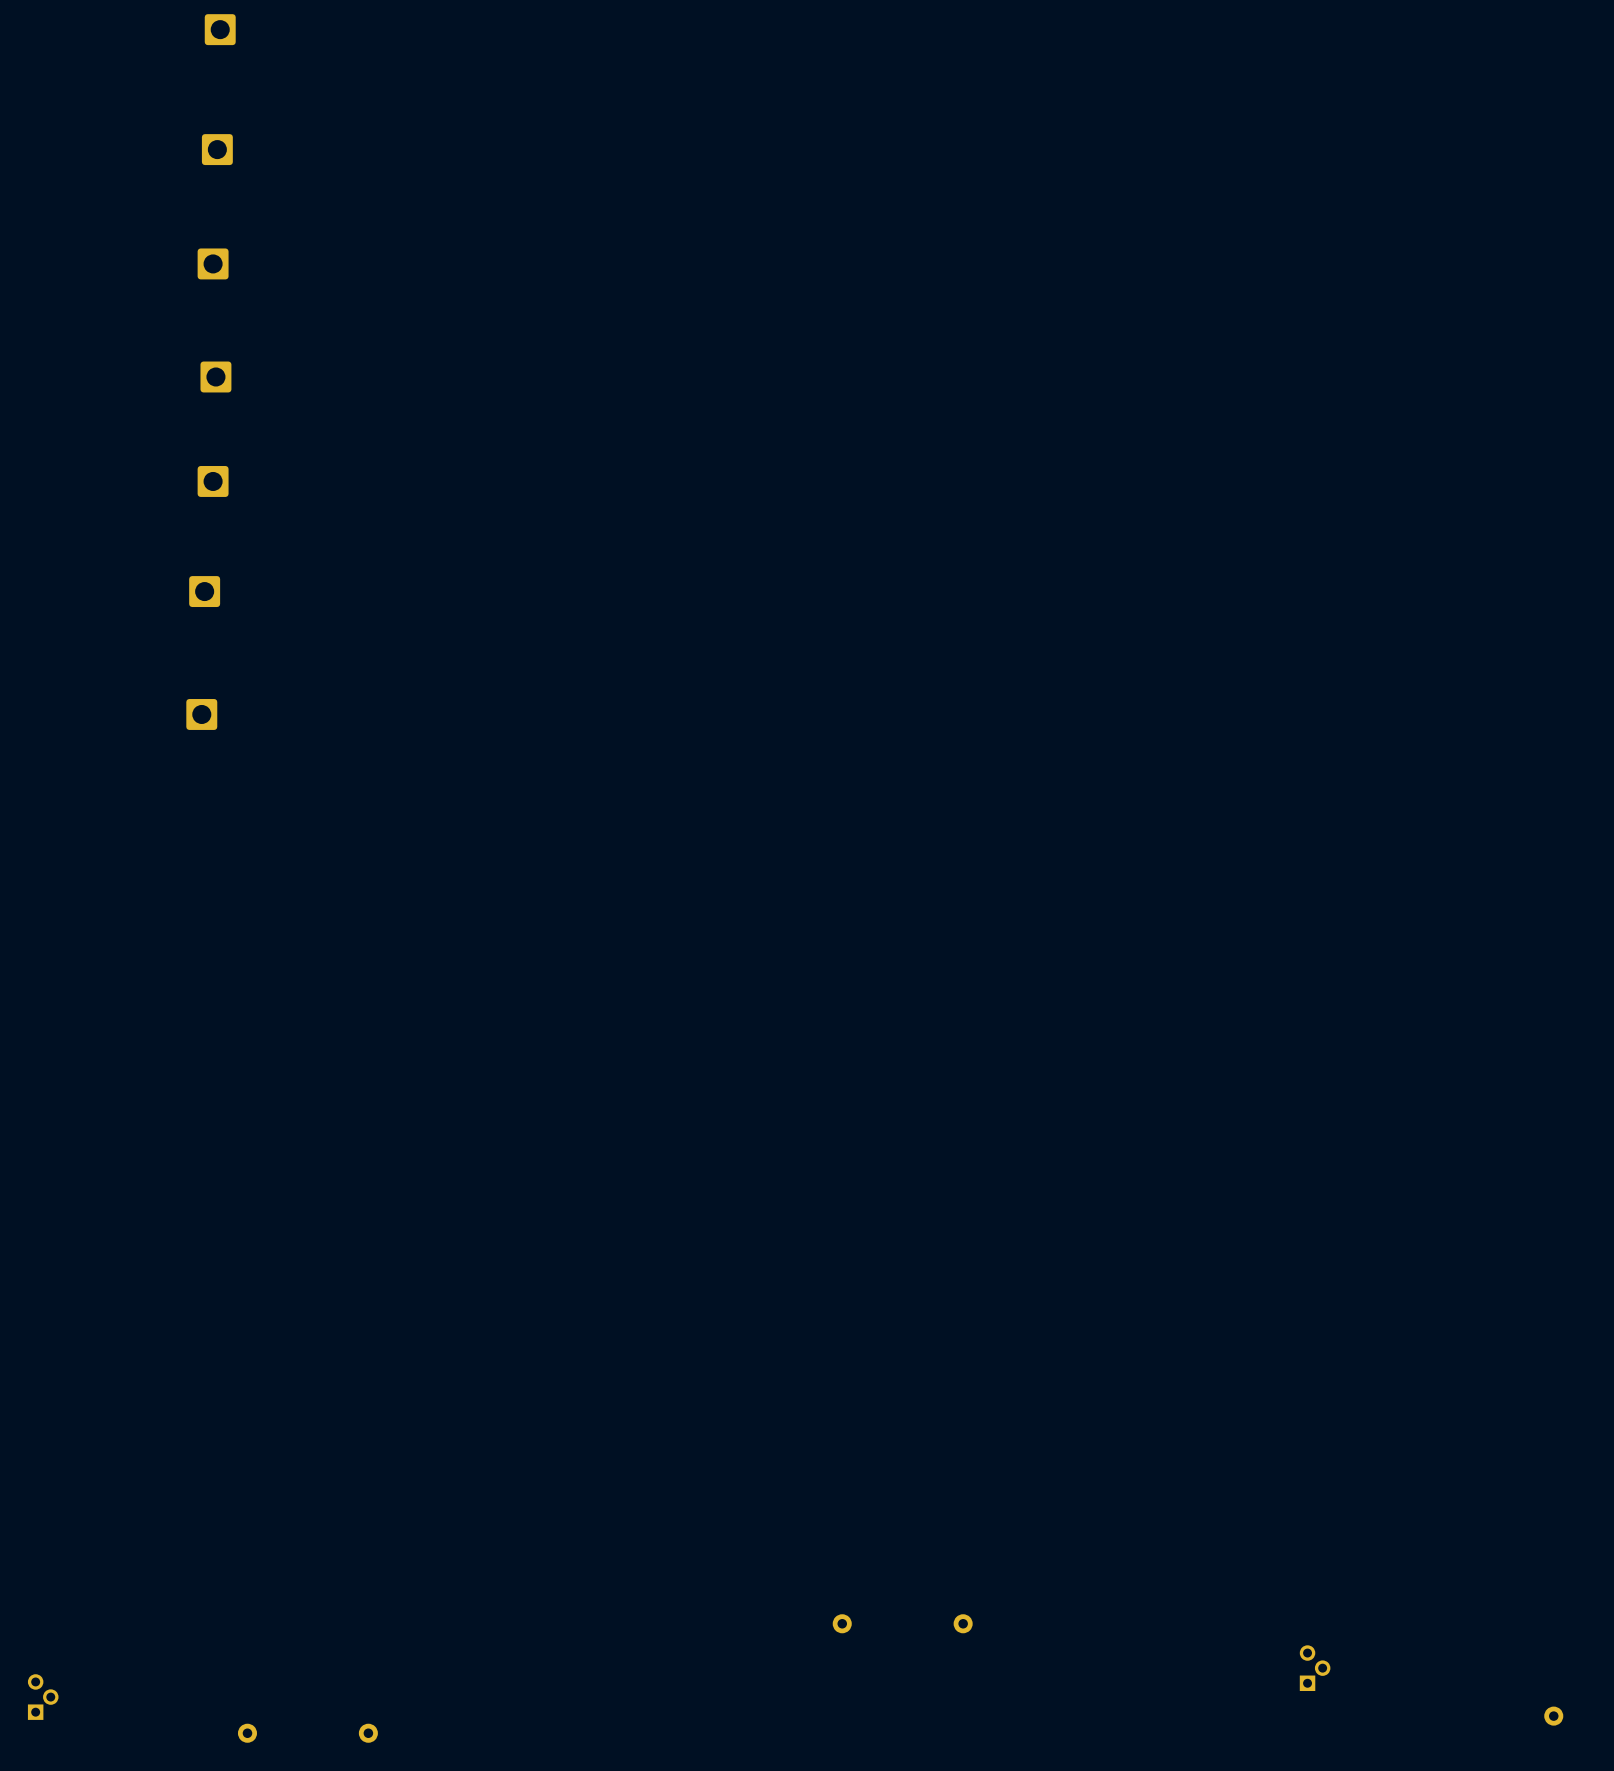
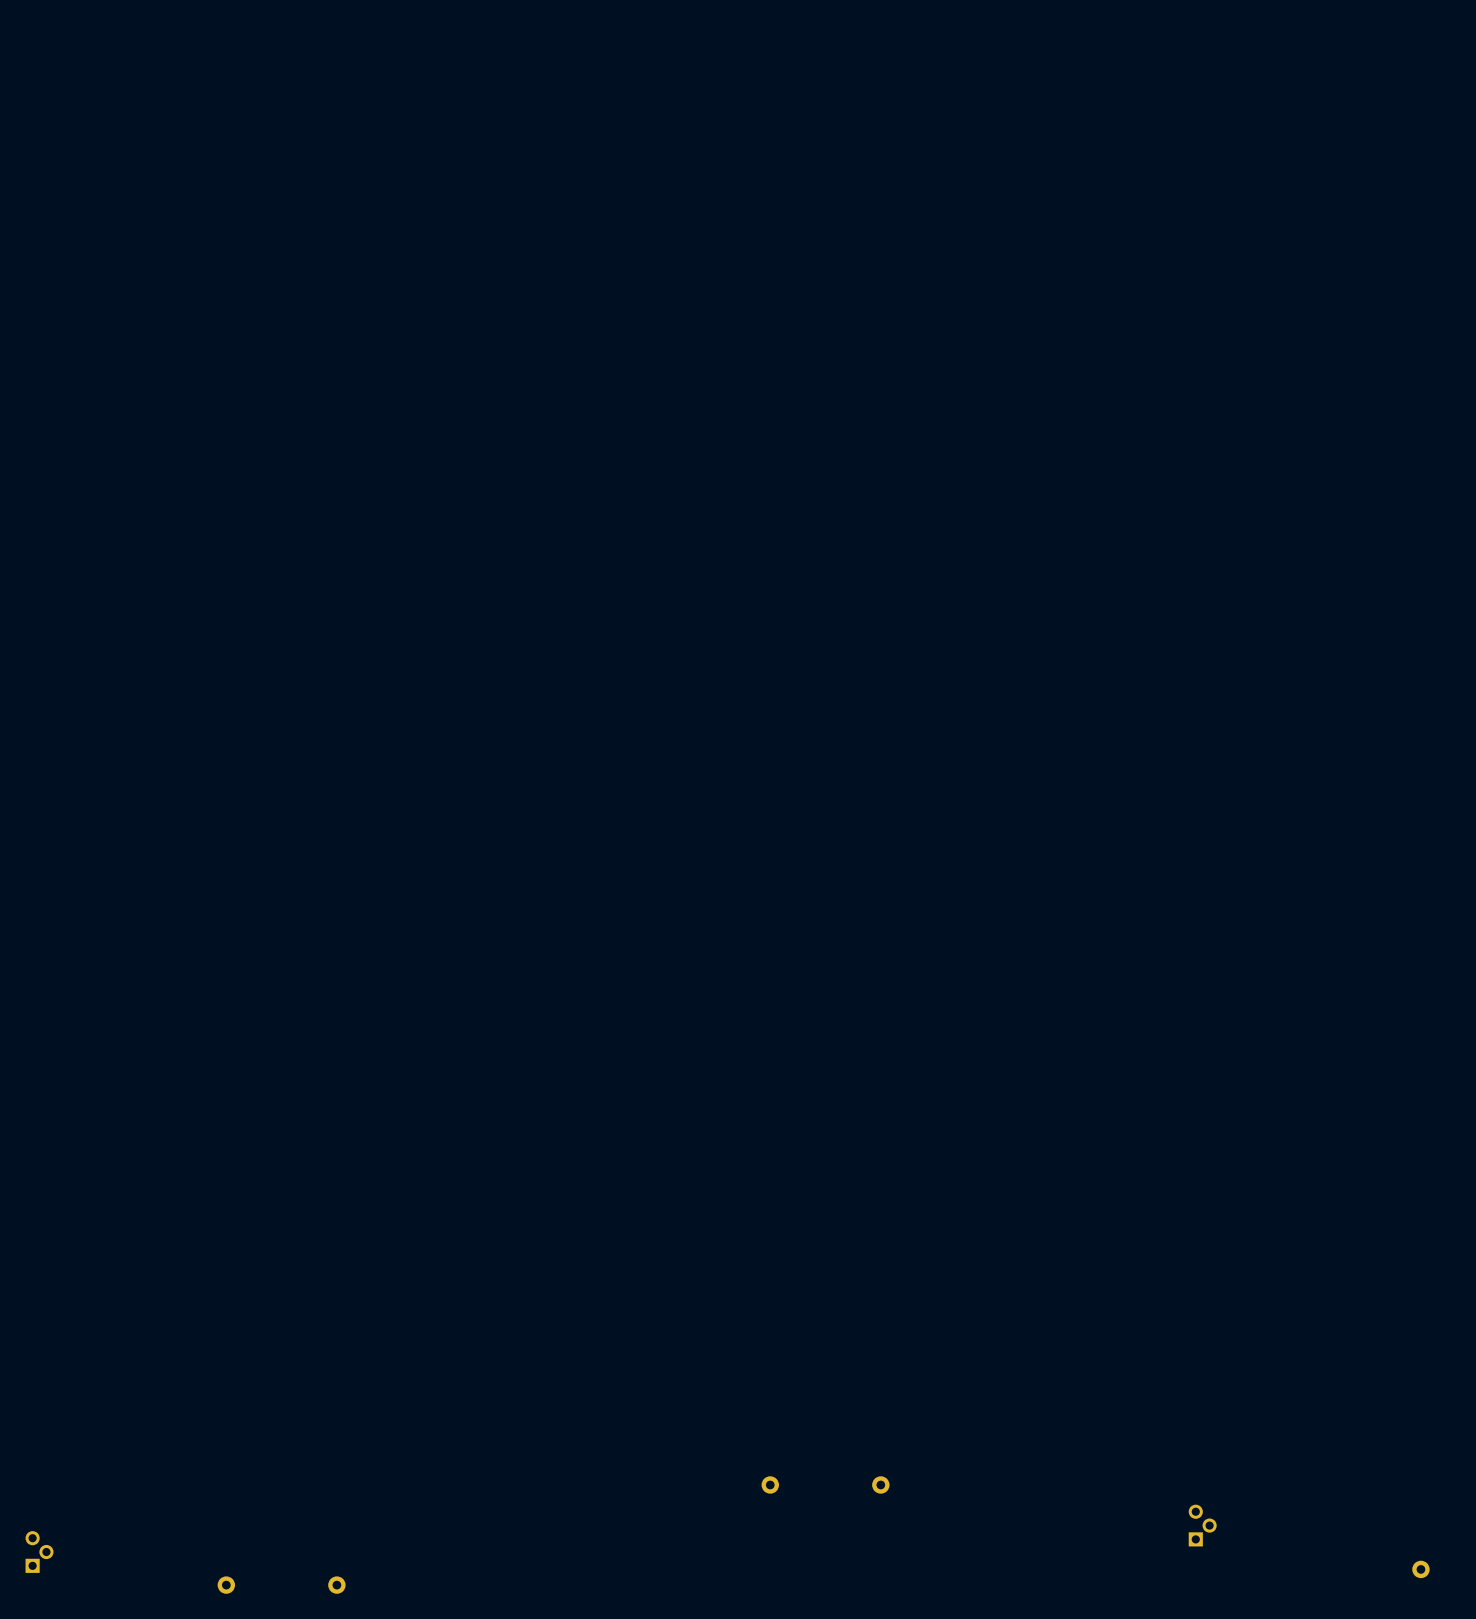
part: (220, 29) -> none
part: (217, 149) -> none
part: (213, 263) -> none
part: (215, 376) -> none
part: (213, 481) -> none
part: (204, 591) -> none
part: (201, 714) -> none

